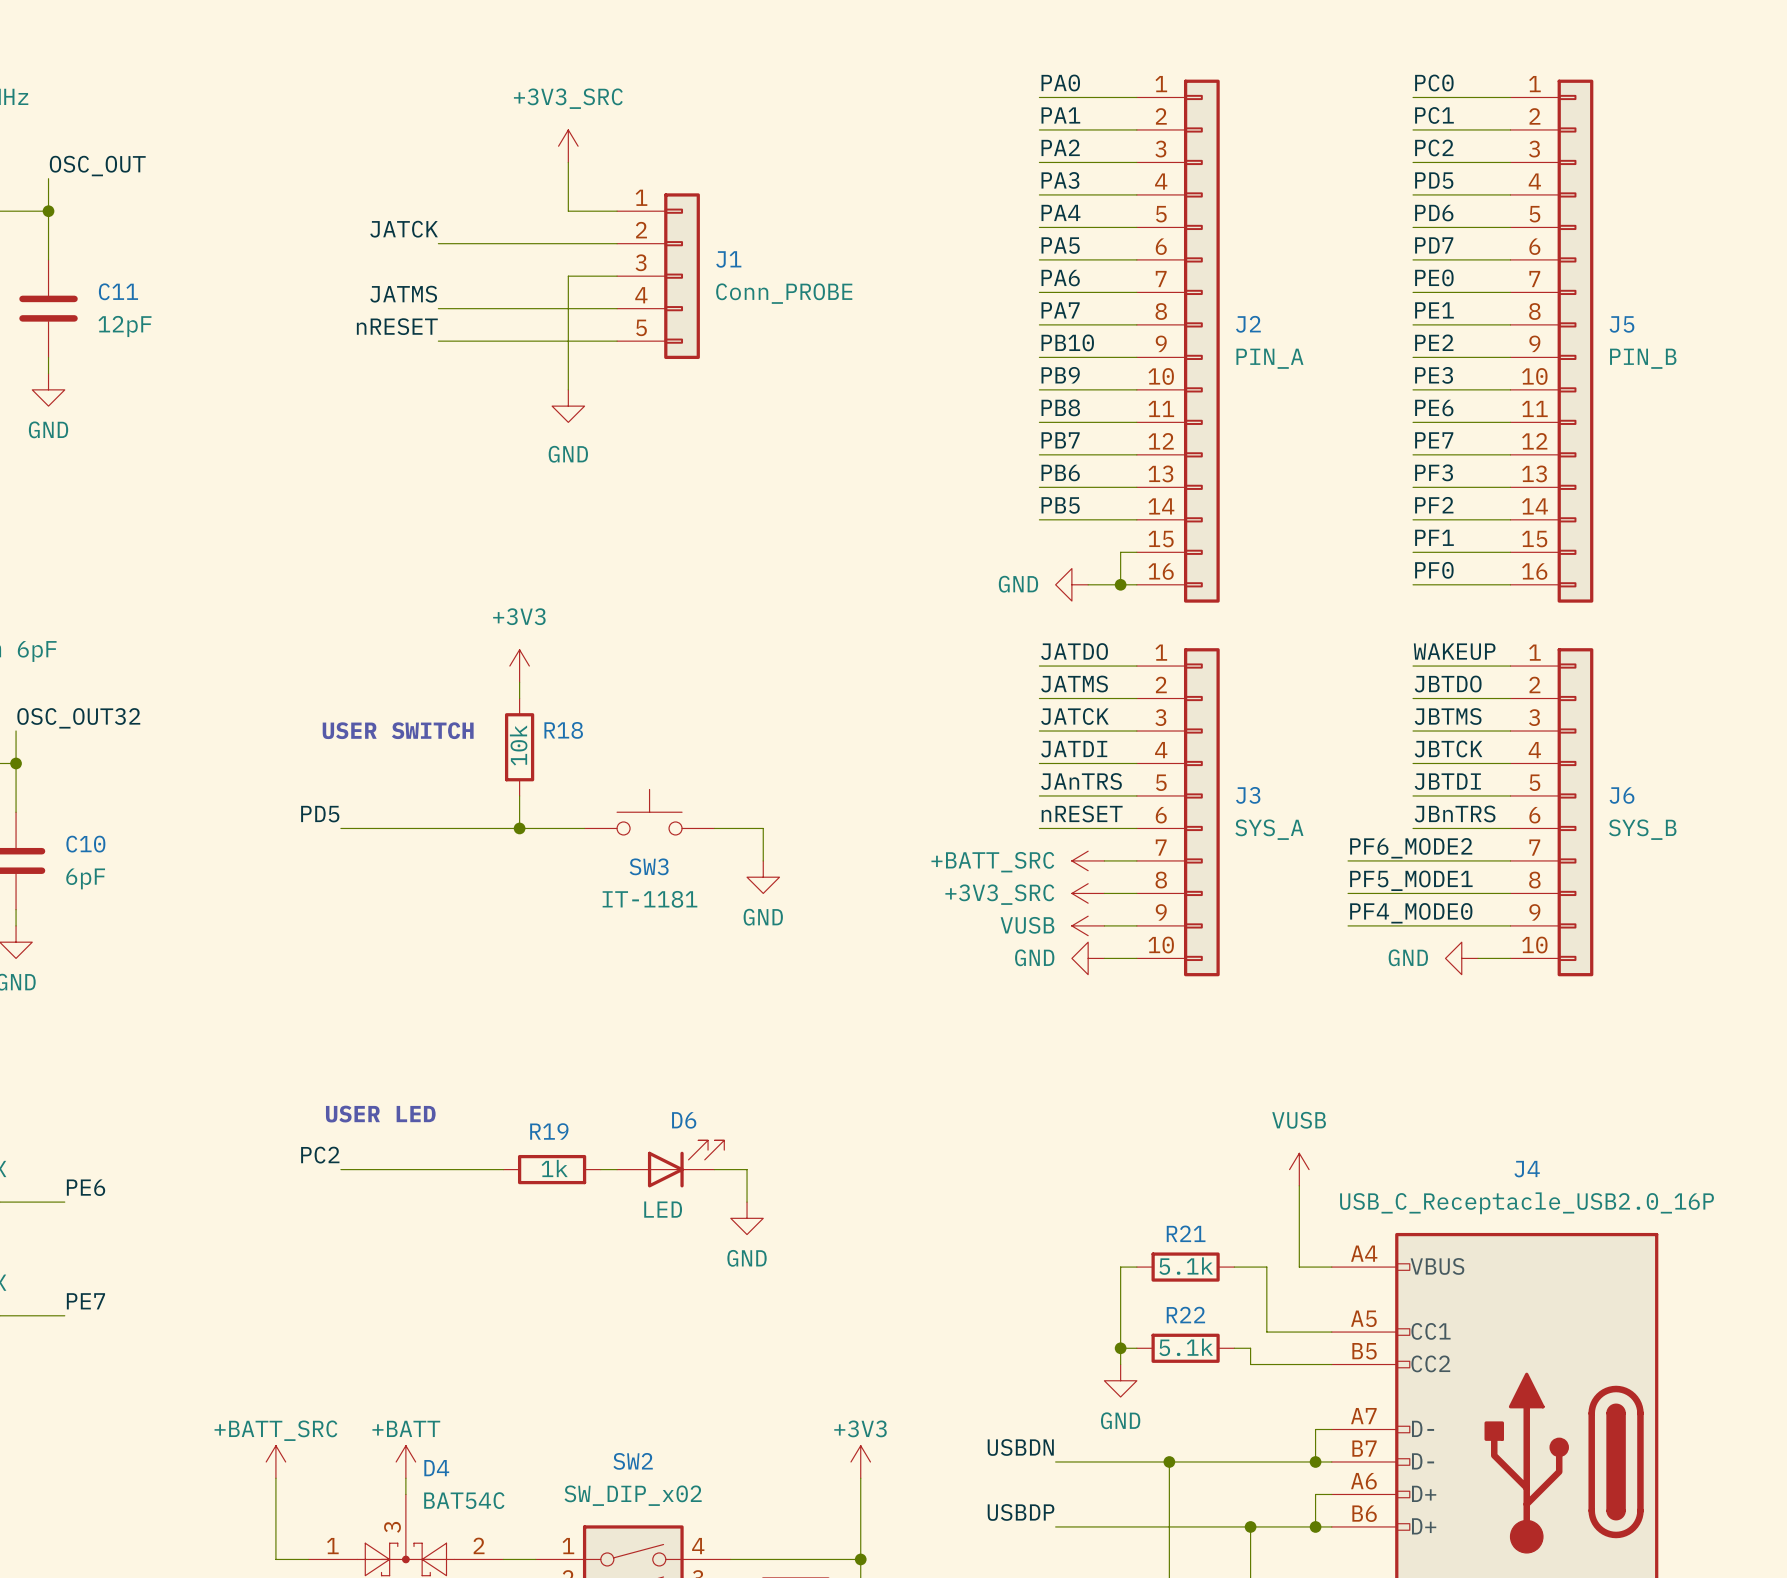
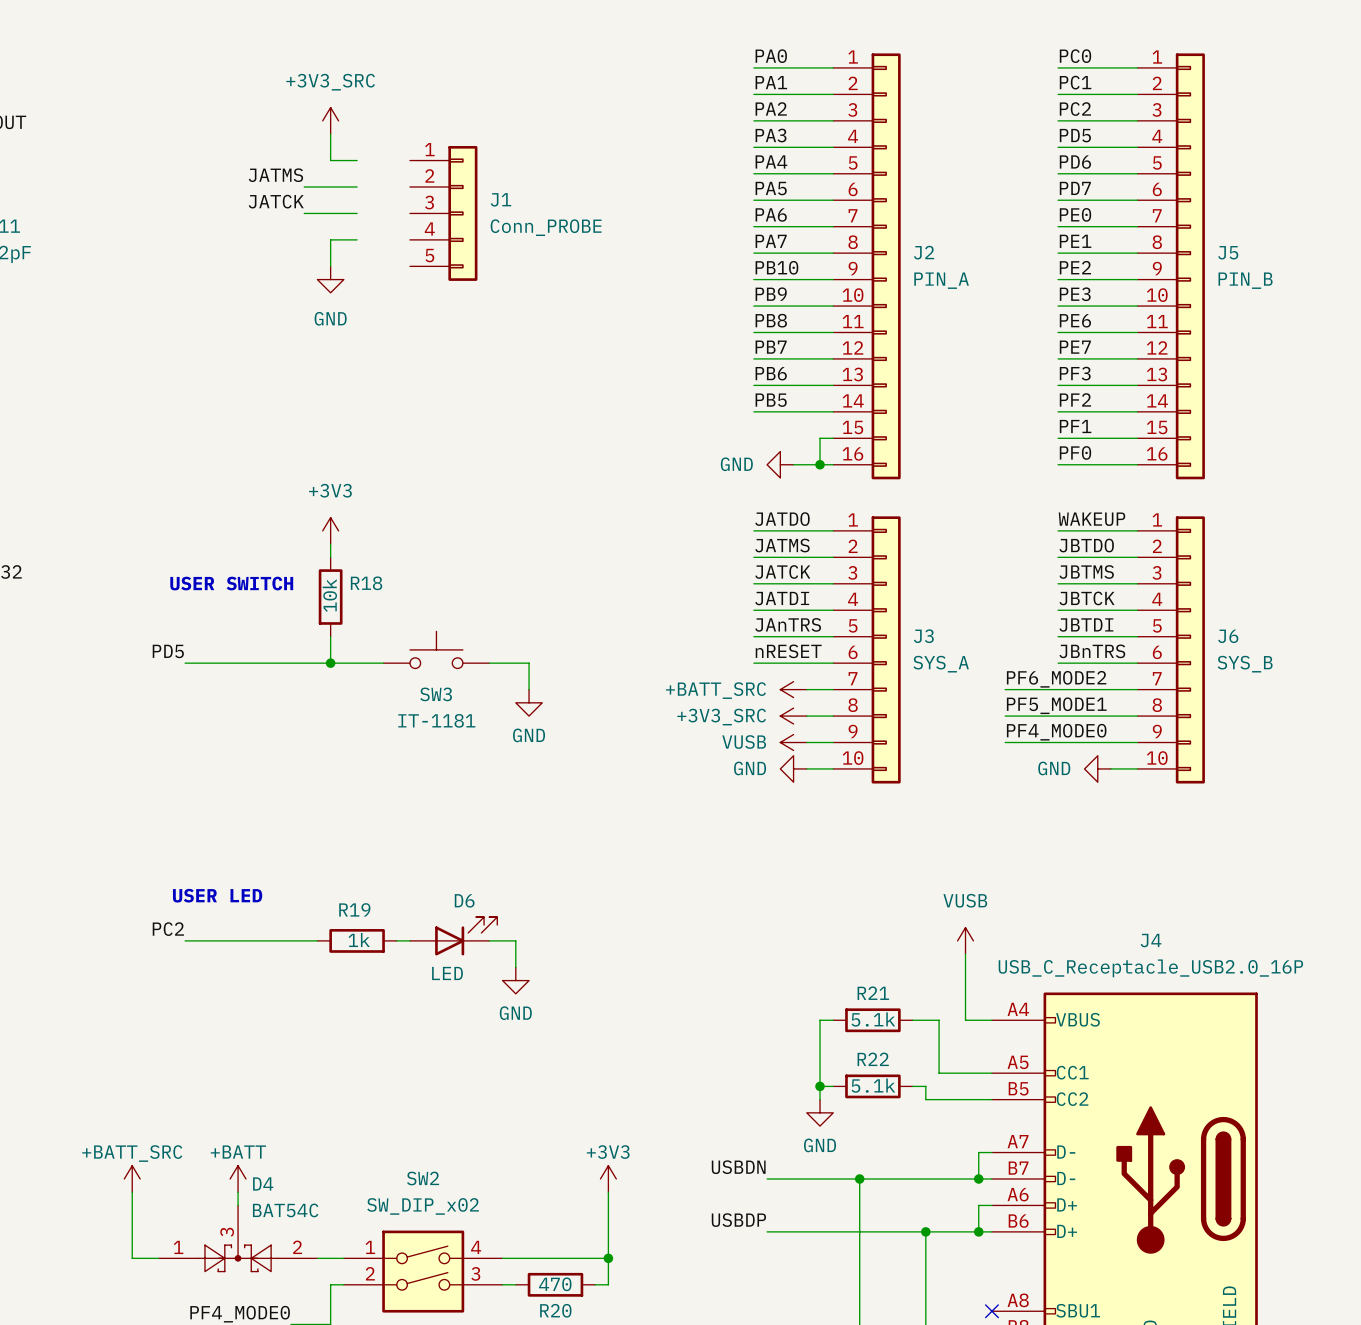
power symbol position: +3V3_SRC (568, 146) -> +3V3_SRC (330, 120)
wire: (568, 162) (568, 211) (617, 211) -> none
wire: none -> (330, 134) (330, 160) (357, 160)
label position: JATCK (404, 229) -> JATCK (276, 201)
wire: (438, 243) (487, 243) -> none
wire: (552, 243) (617, 243) -> (304, 213) (357, 213)
wire: (617, 276) (568, 276) (568, 389) -> none
label position: JATMS (403, 294) -> JATMS (275, 175)
wire: (438, 308) (519, 308) -> (330, 266) (330, 239)
wire: (552, 308) (617, 308) -> none
label: nRESET (397, 326) -> none
wire: (438, 341) (617, 341) -> none
power symbol position: GND (568, 406) -> GND (330, 279)

